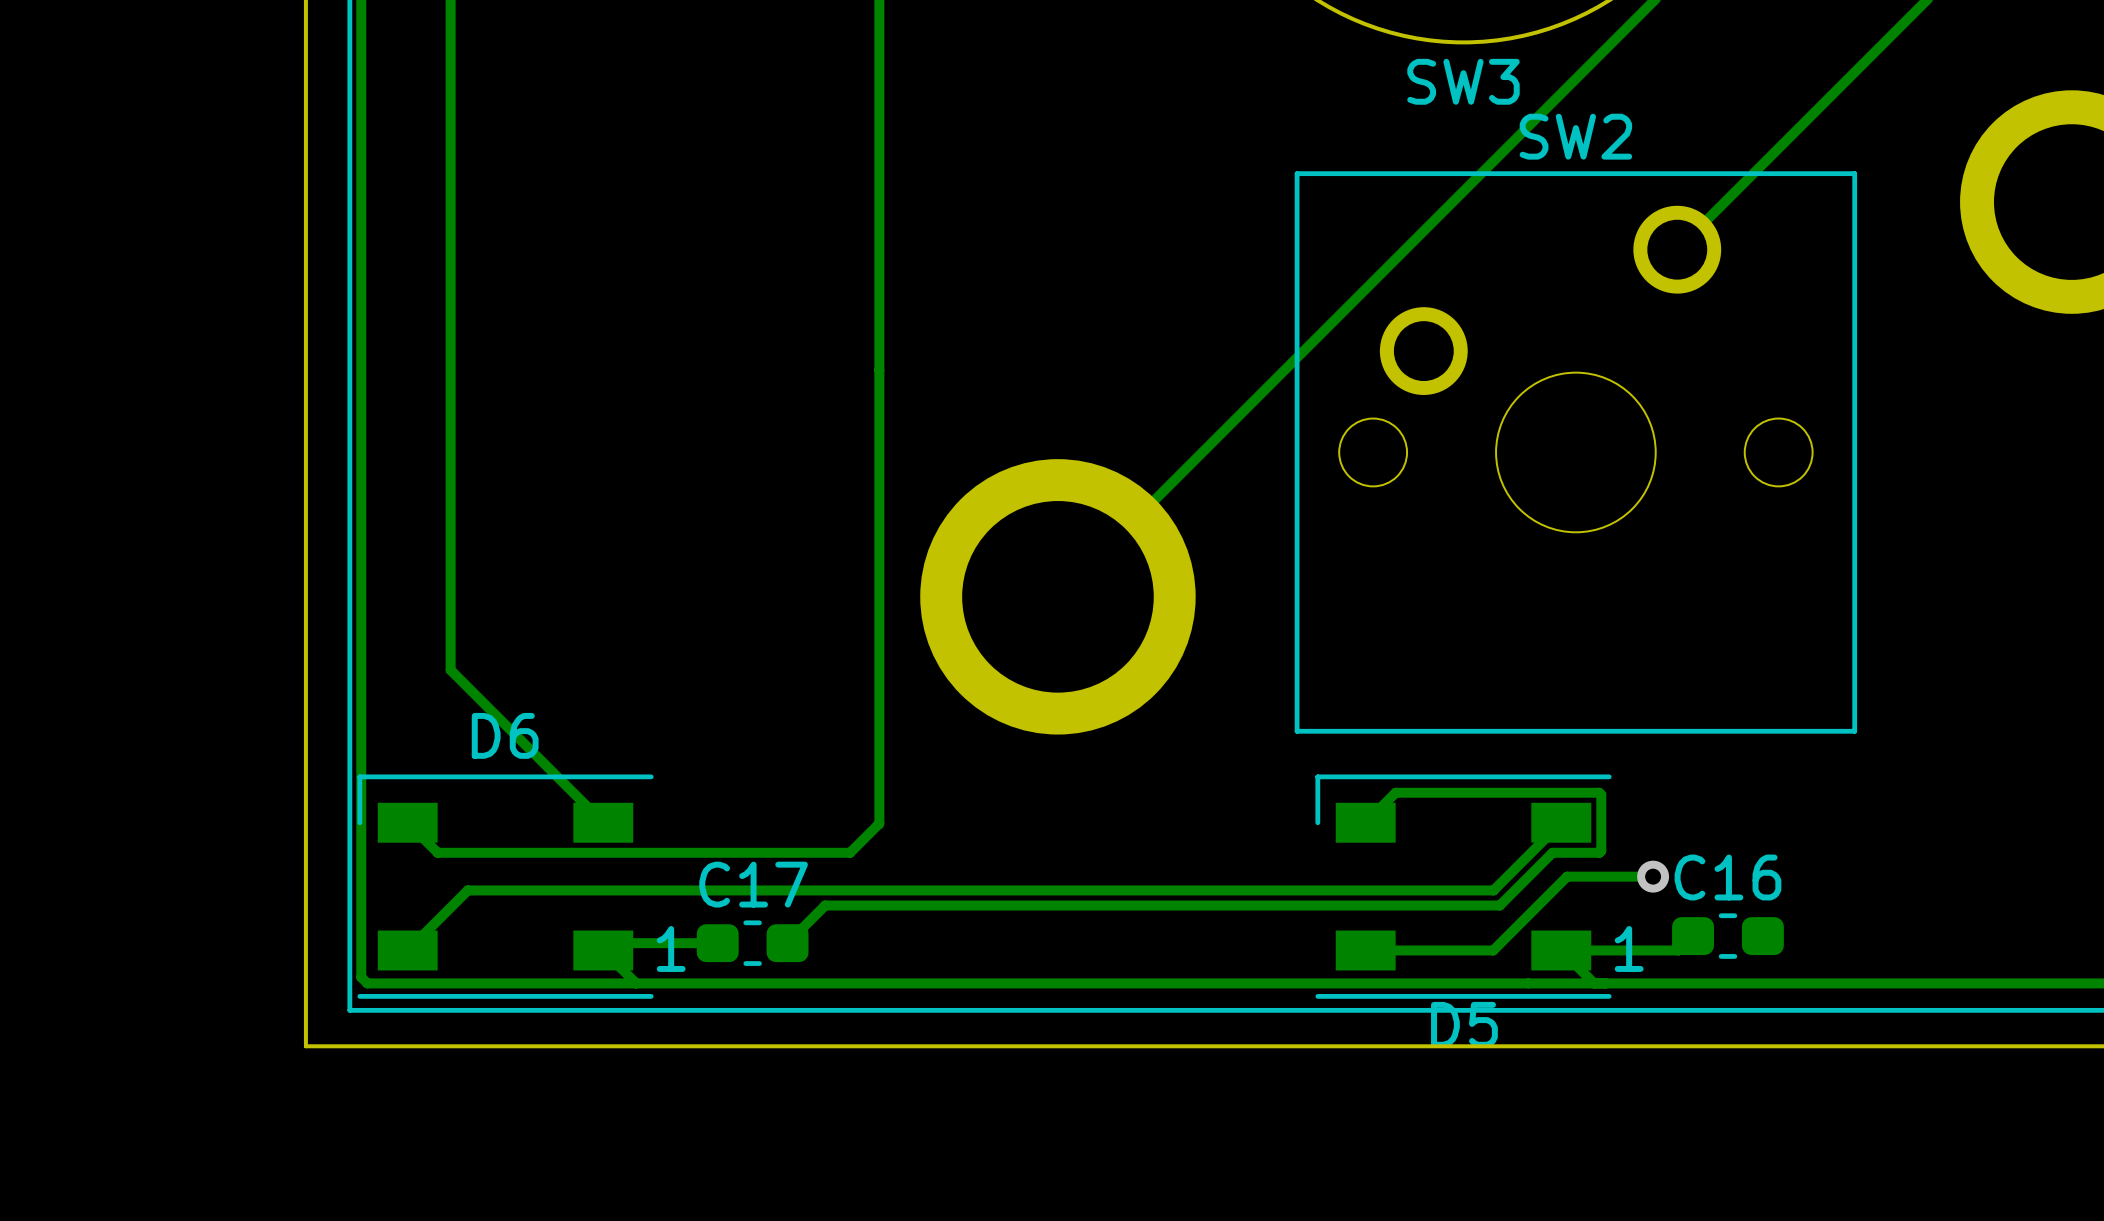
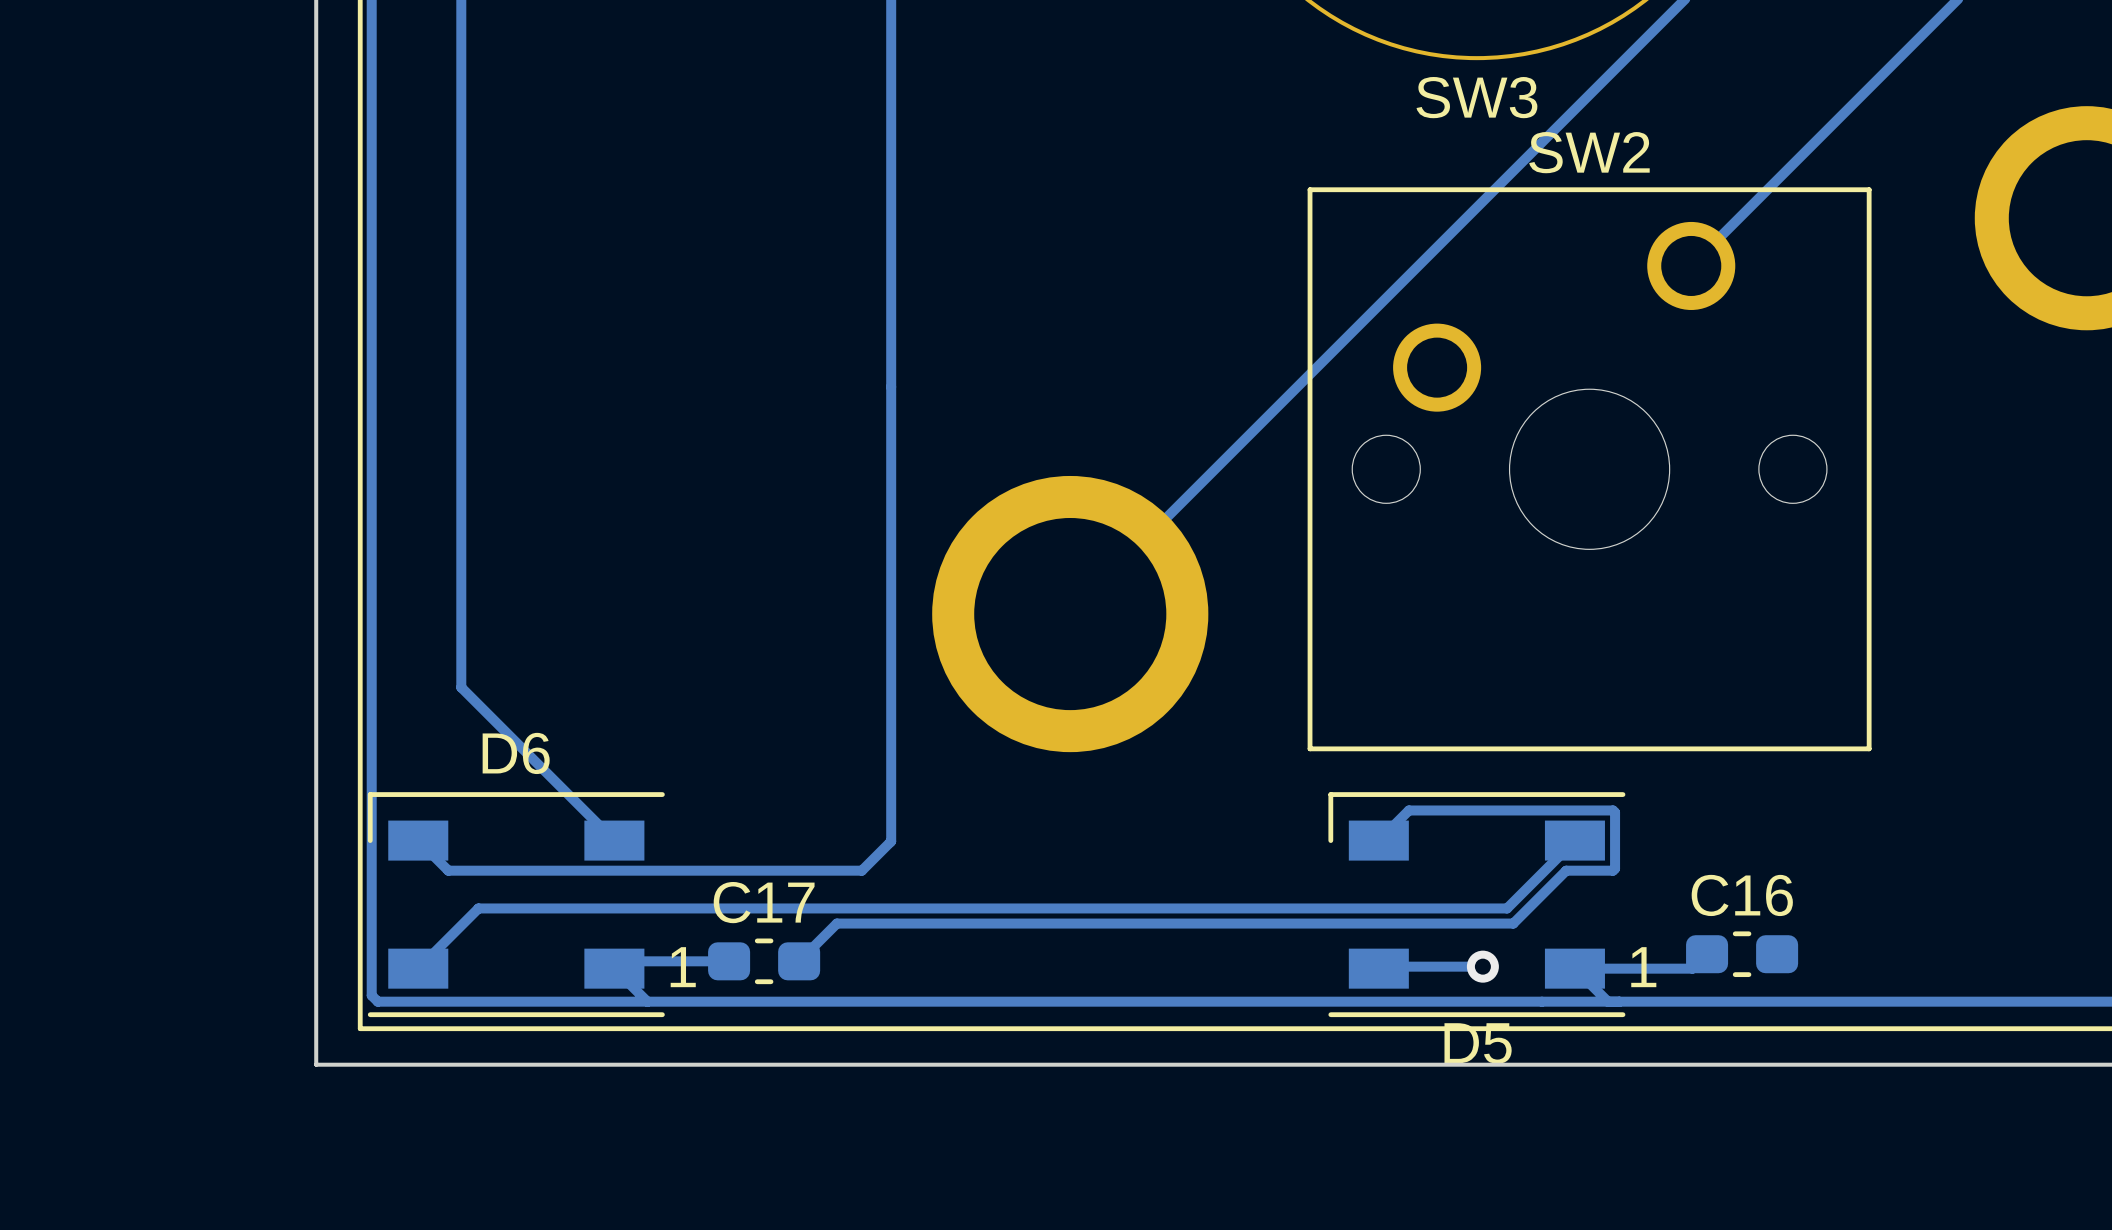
track: (1653, 876) (1567, 876) (1493, 950) (1365, 950) -> (1482, 966) (1380, 966) (1378, 968)
via position: (1653, 876) -> (1482, 966)

